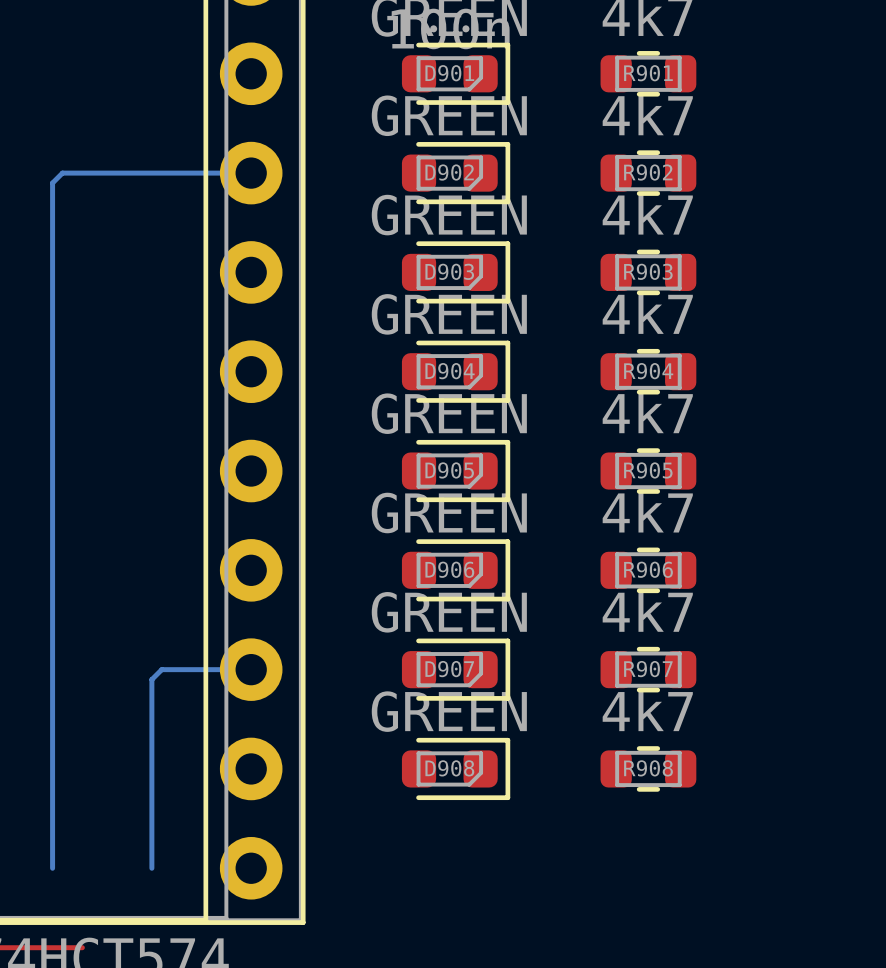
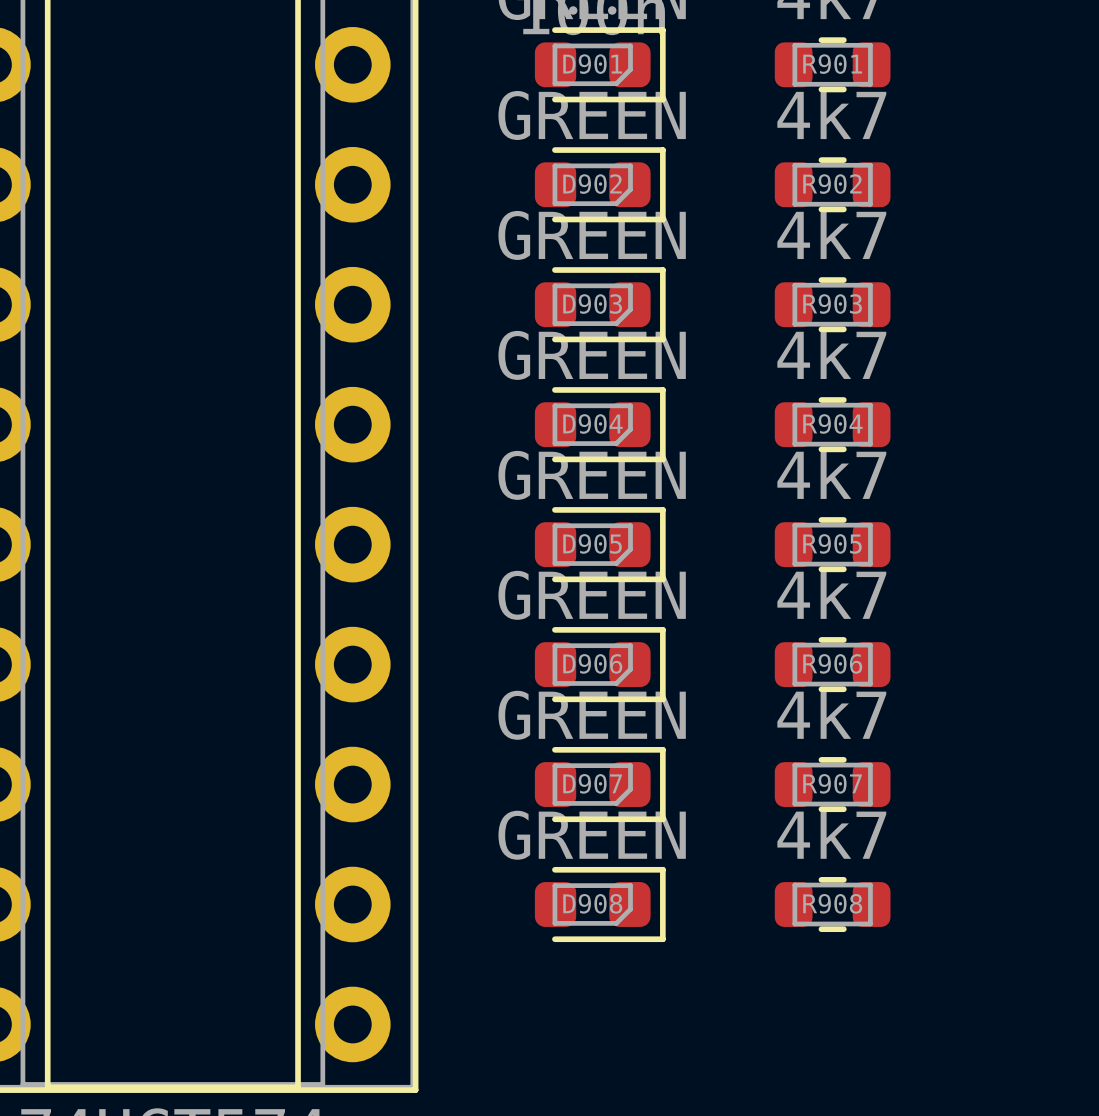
bottom track: (251, 173) (62, 173) (52, 183) (52, 868) -> none
bottom track: (251, 669) (161, 669) (151, 679) (151, 868) -> none

